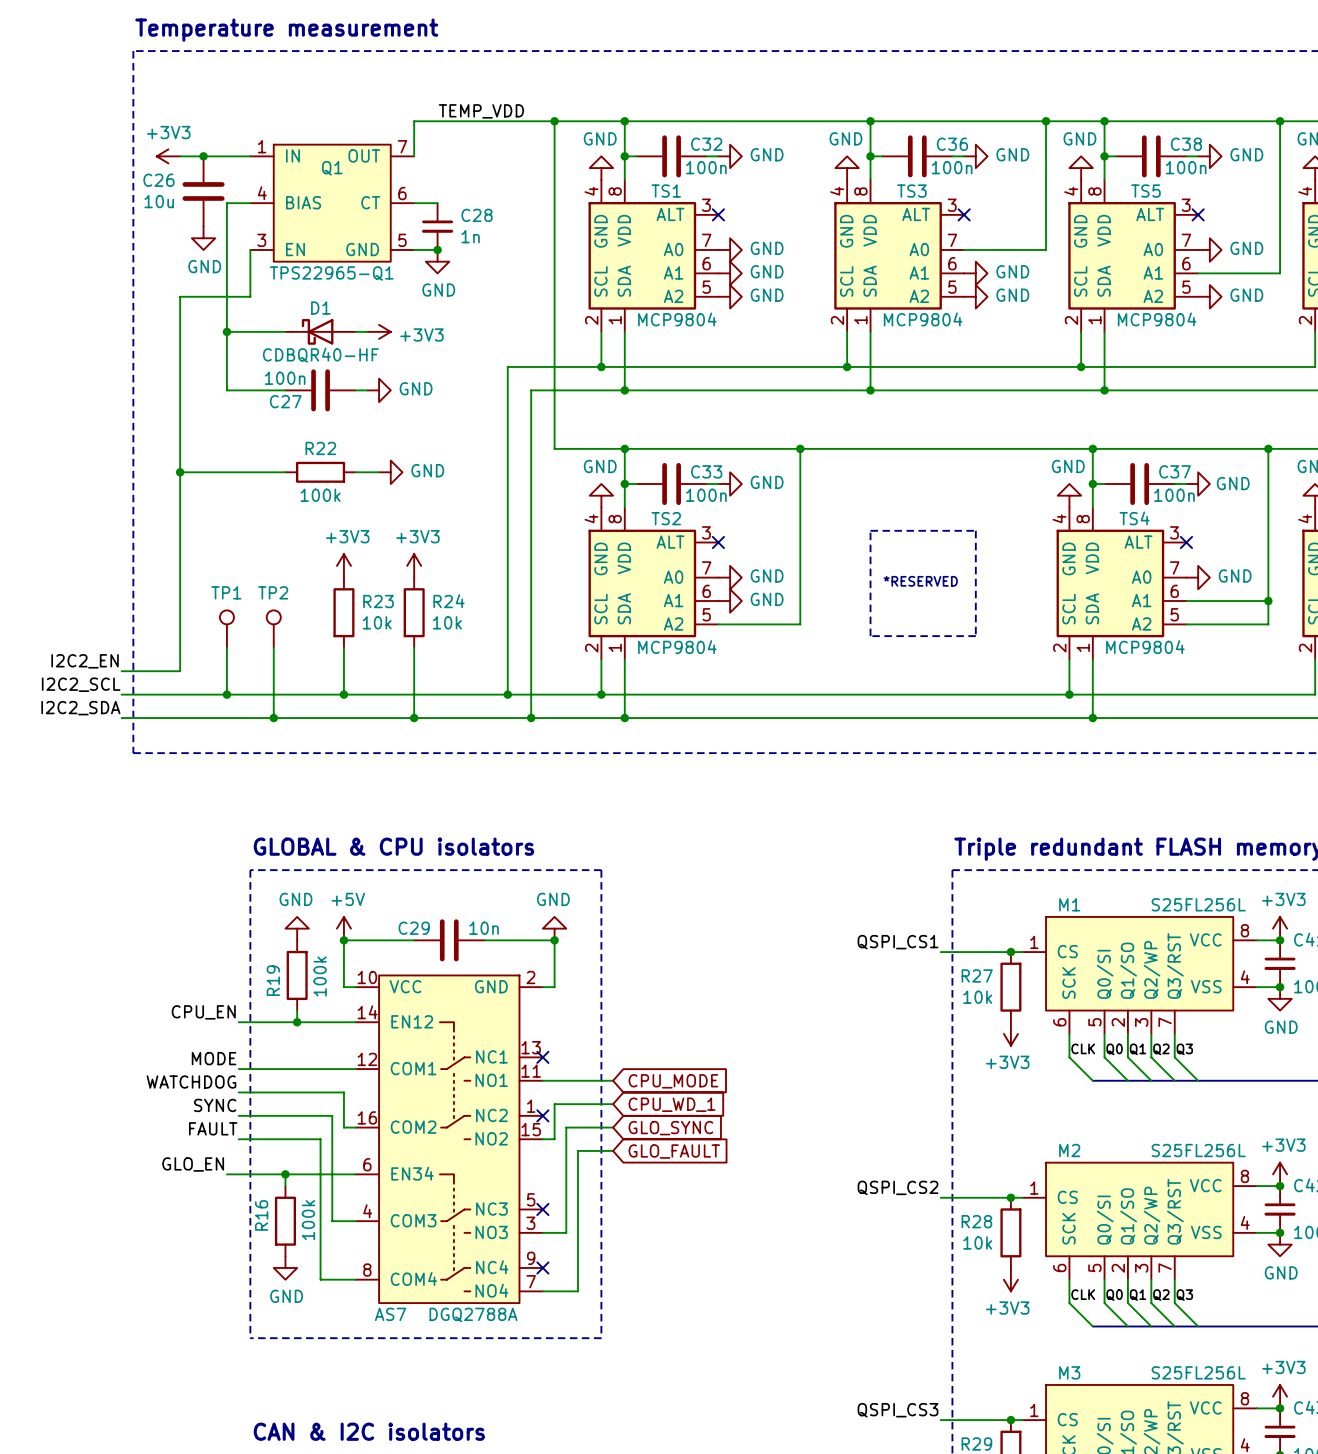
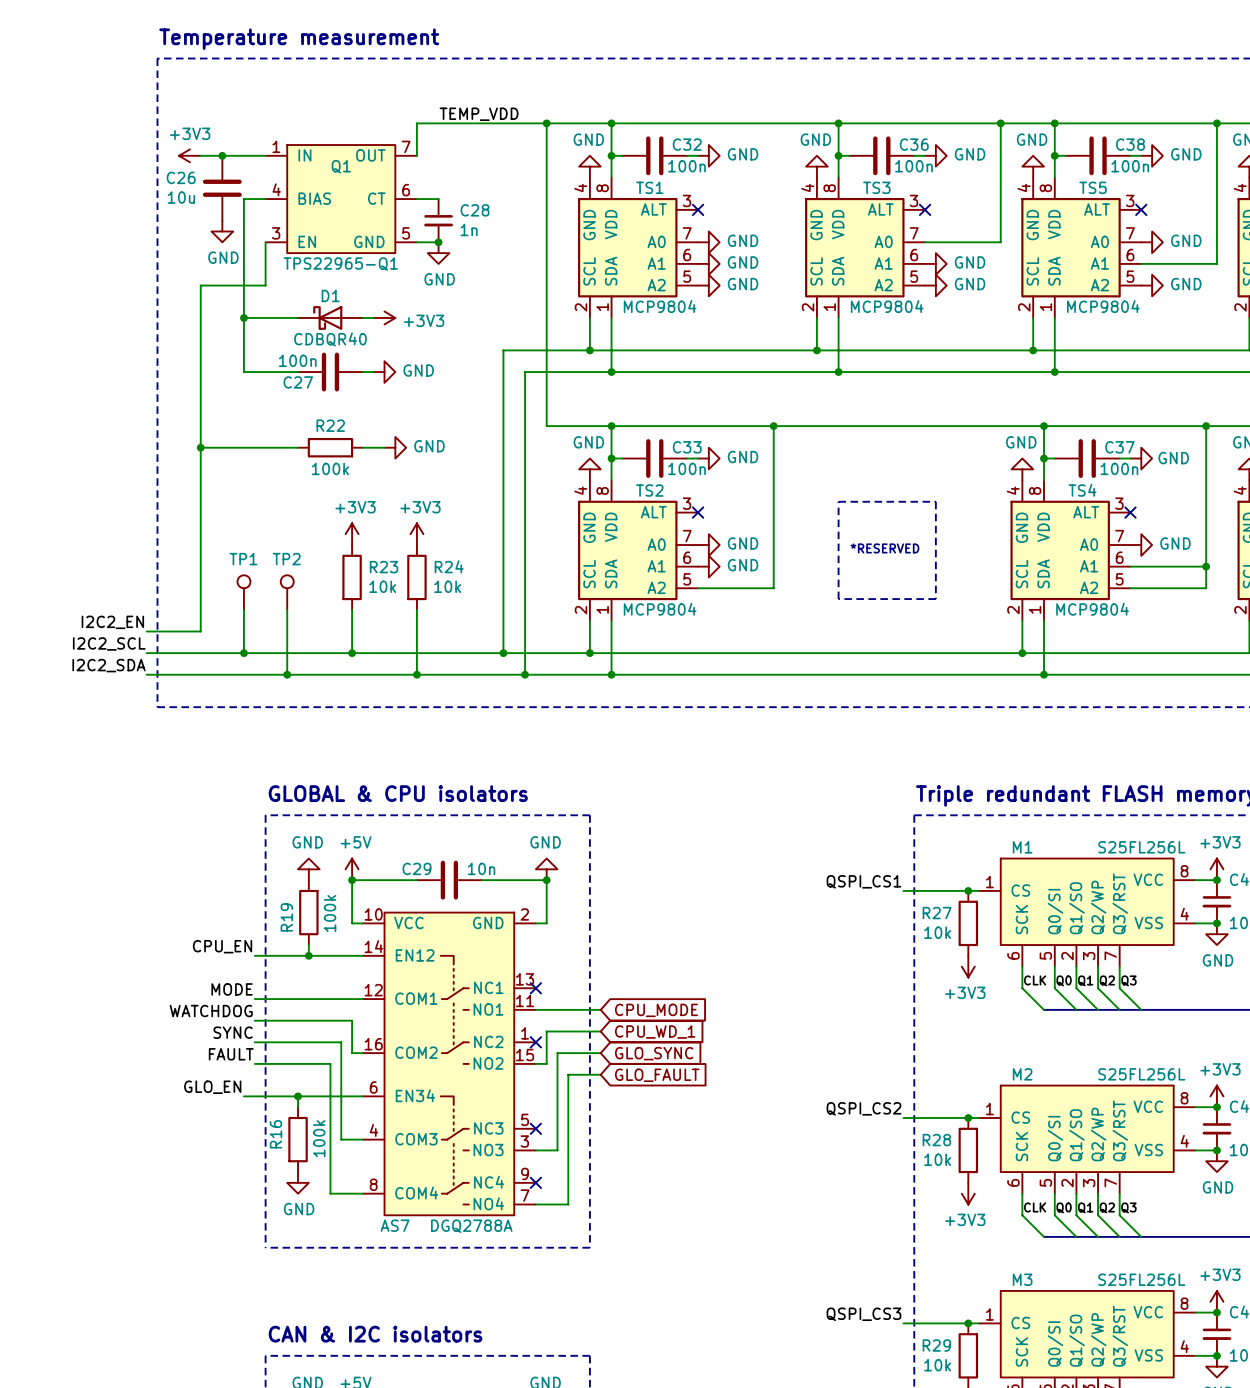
D1 value: CDBQR40-HF (320, 355) -> CDBQR40 (330, 339)

